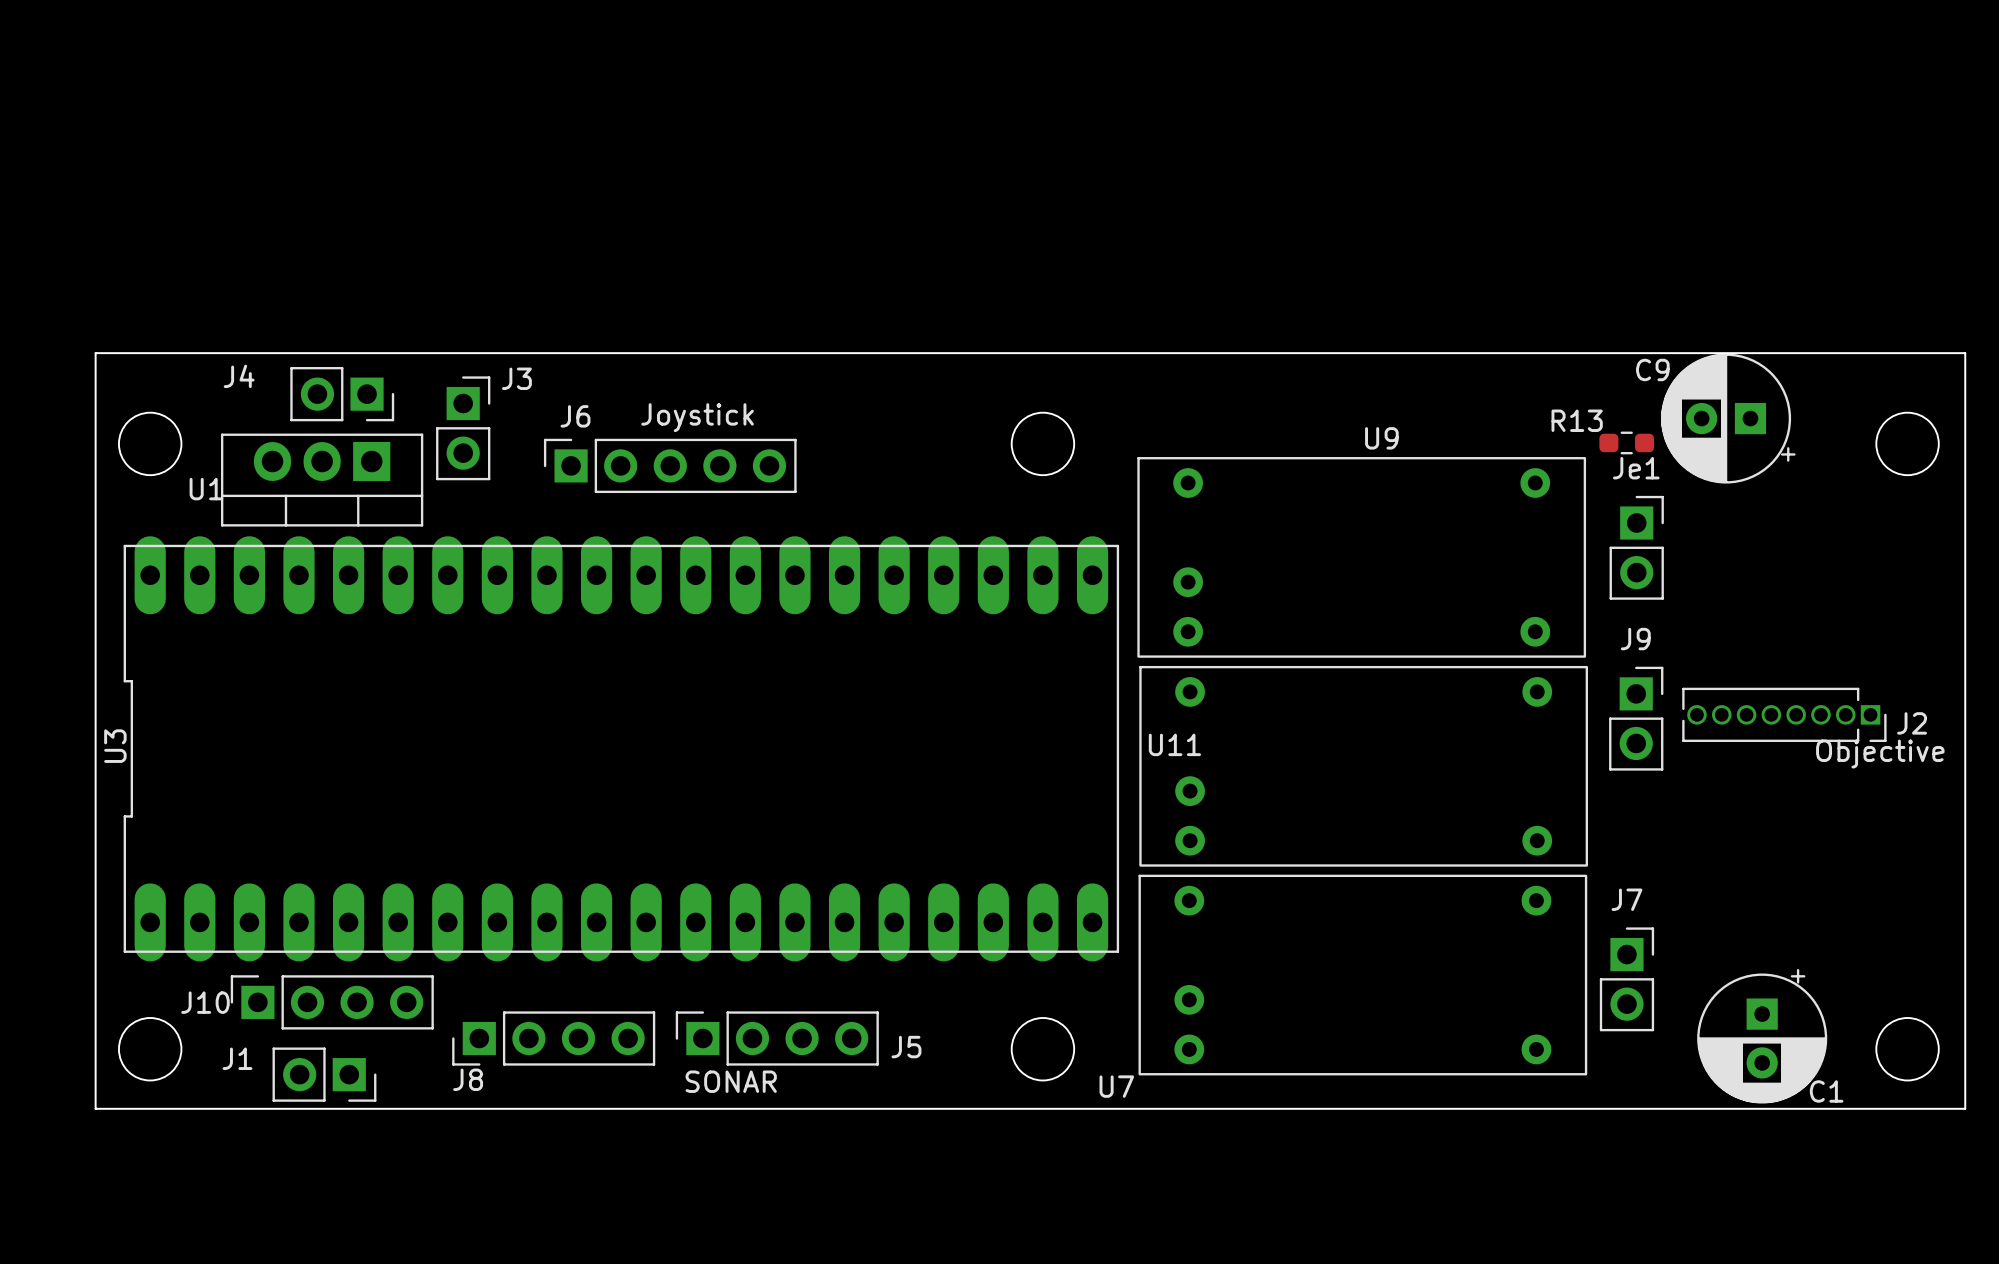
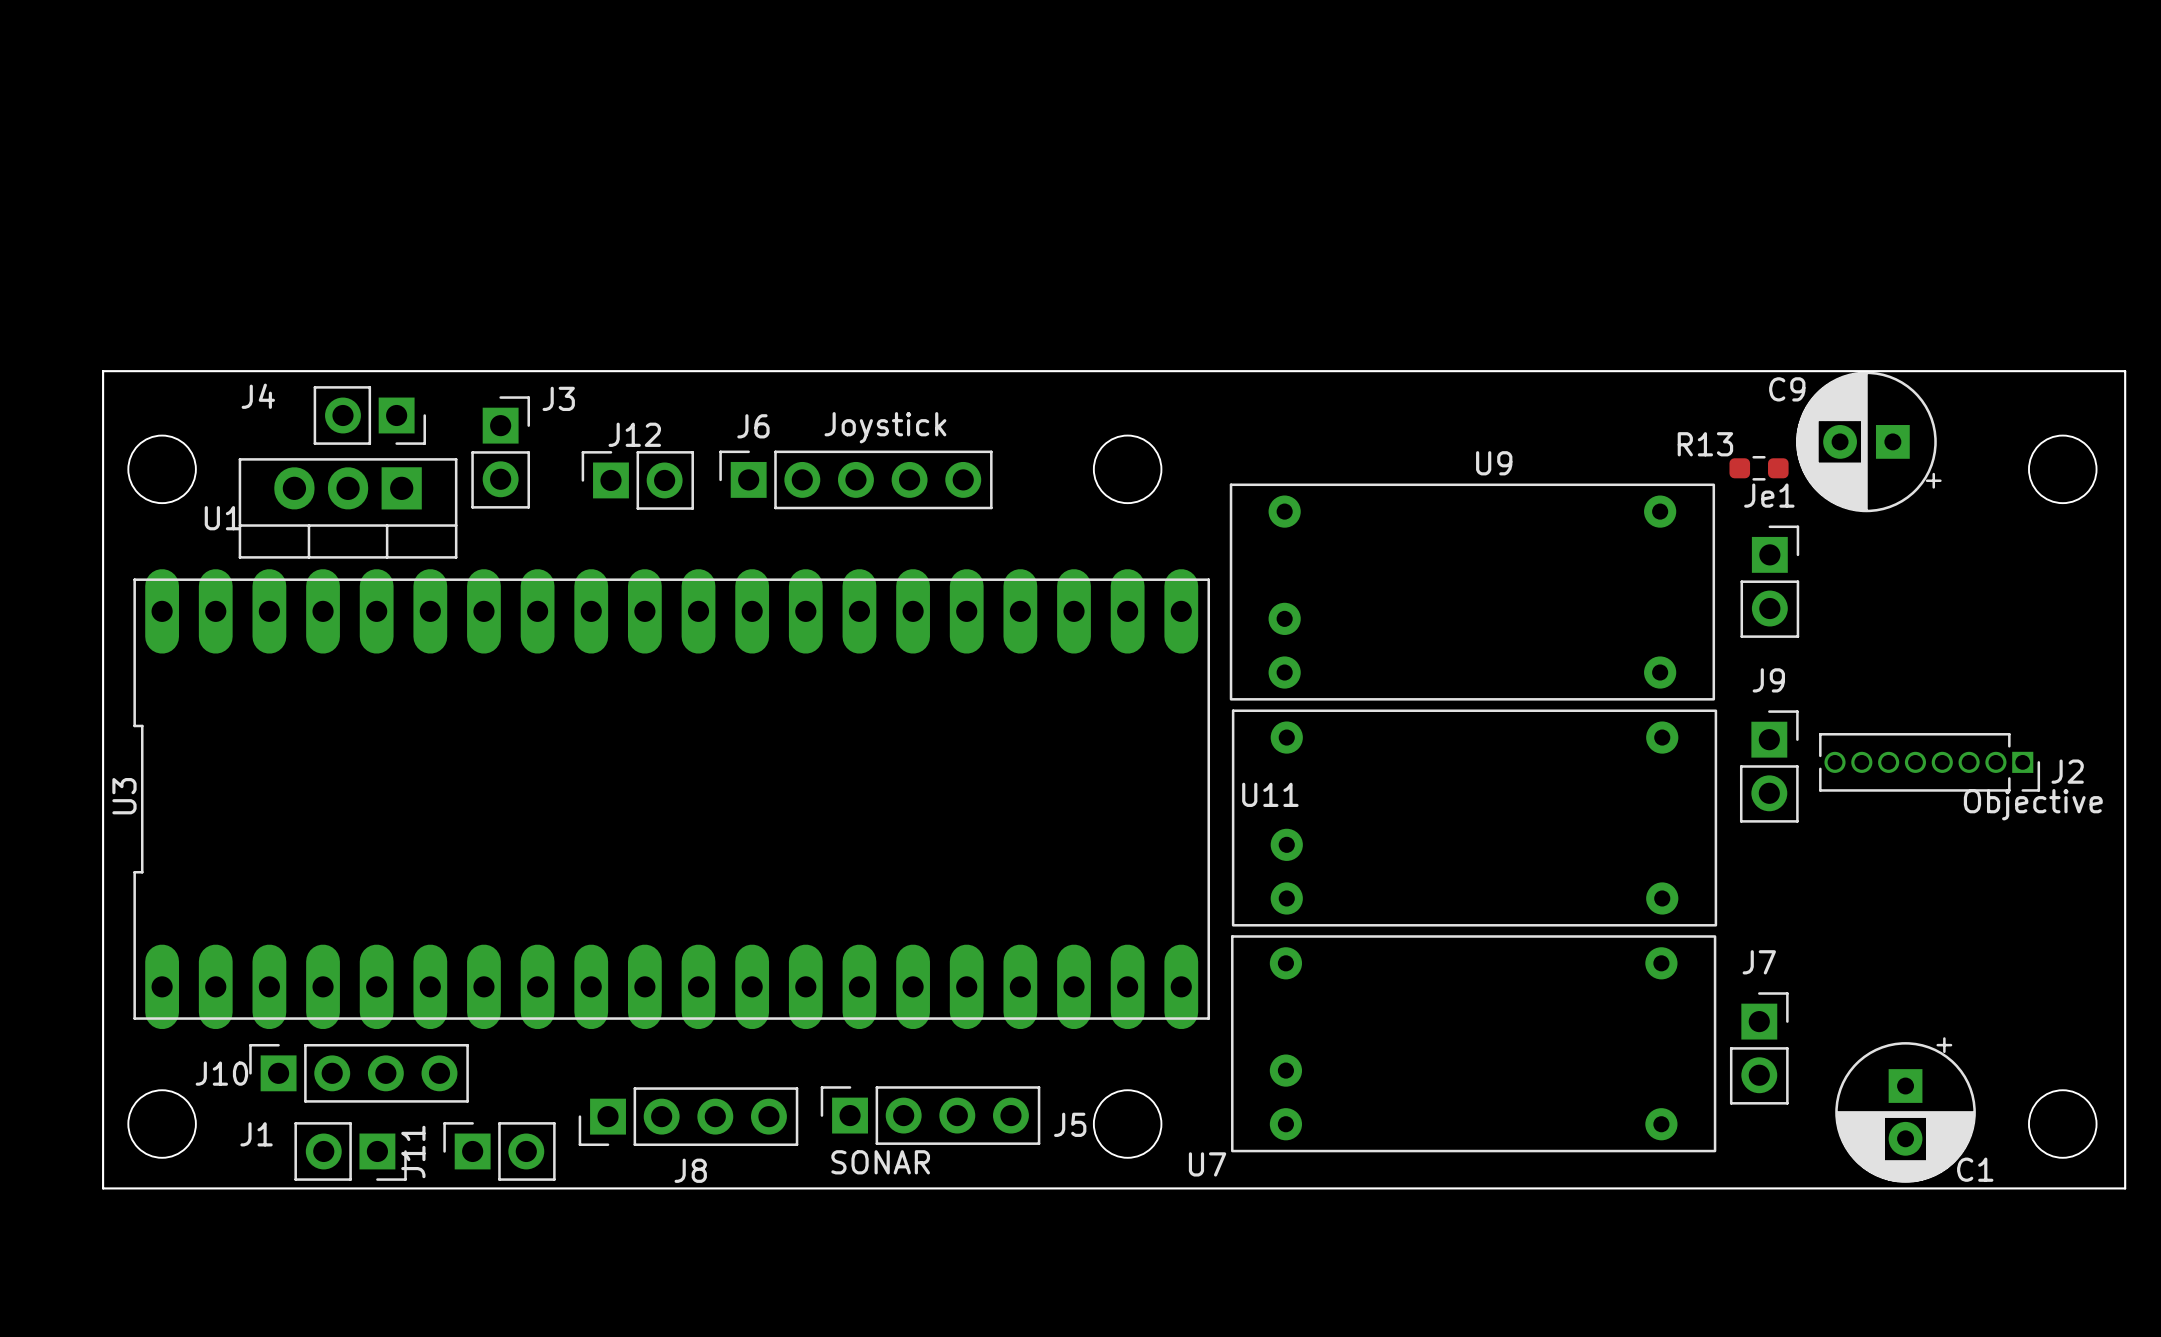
J12: none -> (637, 480)
J6 position: (670, 465) -> (855, 479)
J8 position: (553, 1038) -> (688, 1116)
J5 position: (777, 1038) -> (930, 1115)
J11: none -> (499, 1151)
J8 name position: J8 (468, 1079) -> J8 (690, 1170)

